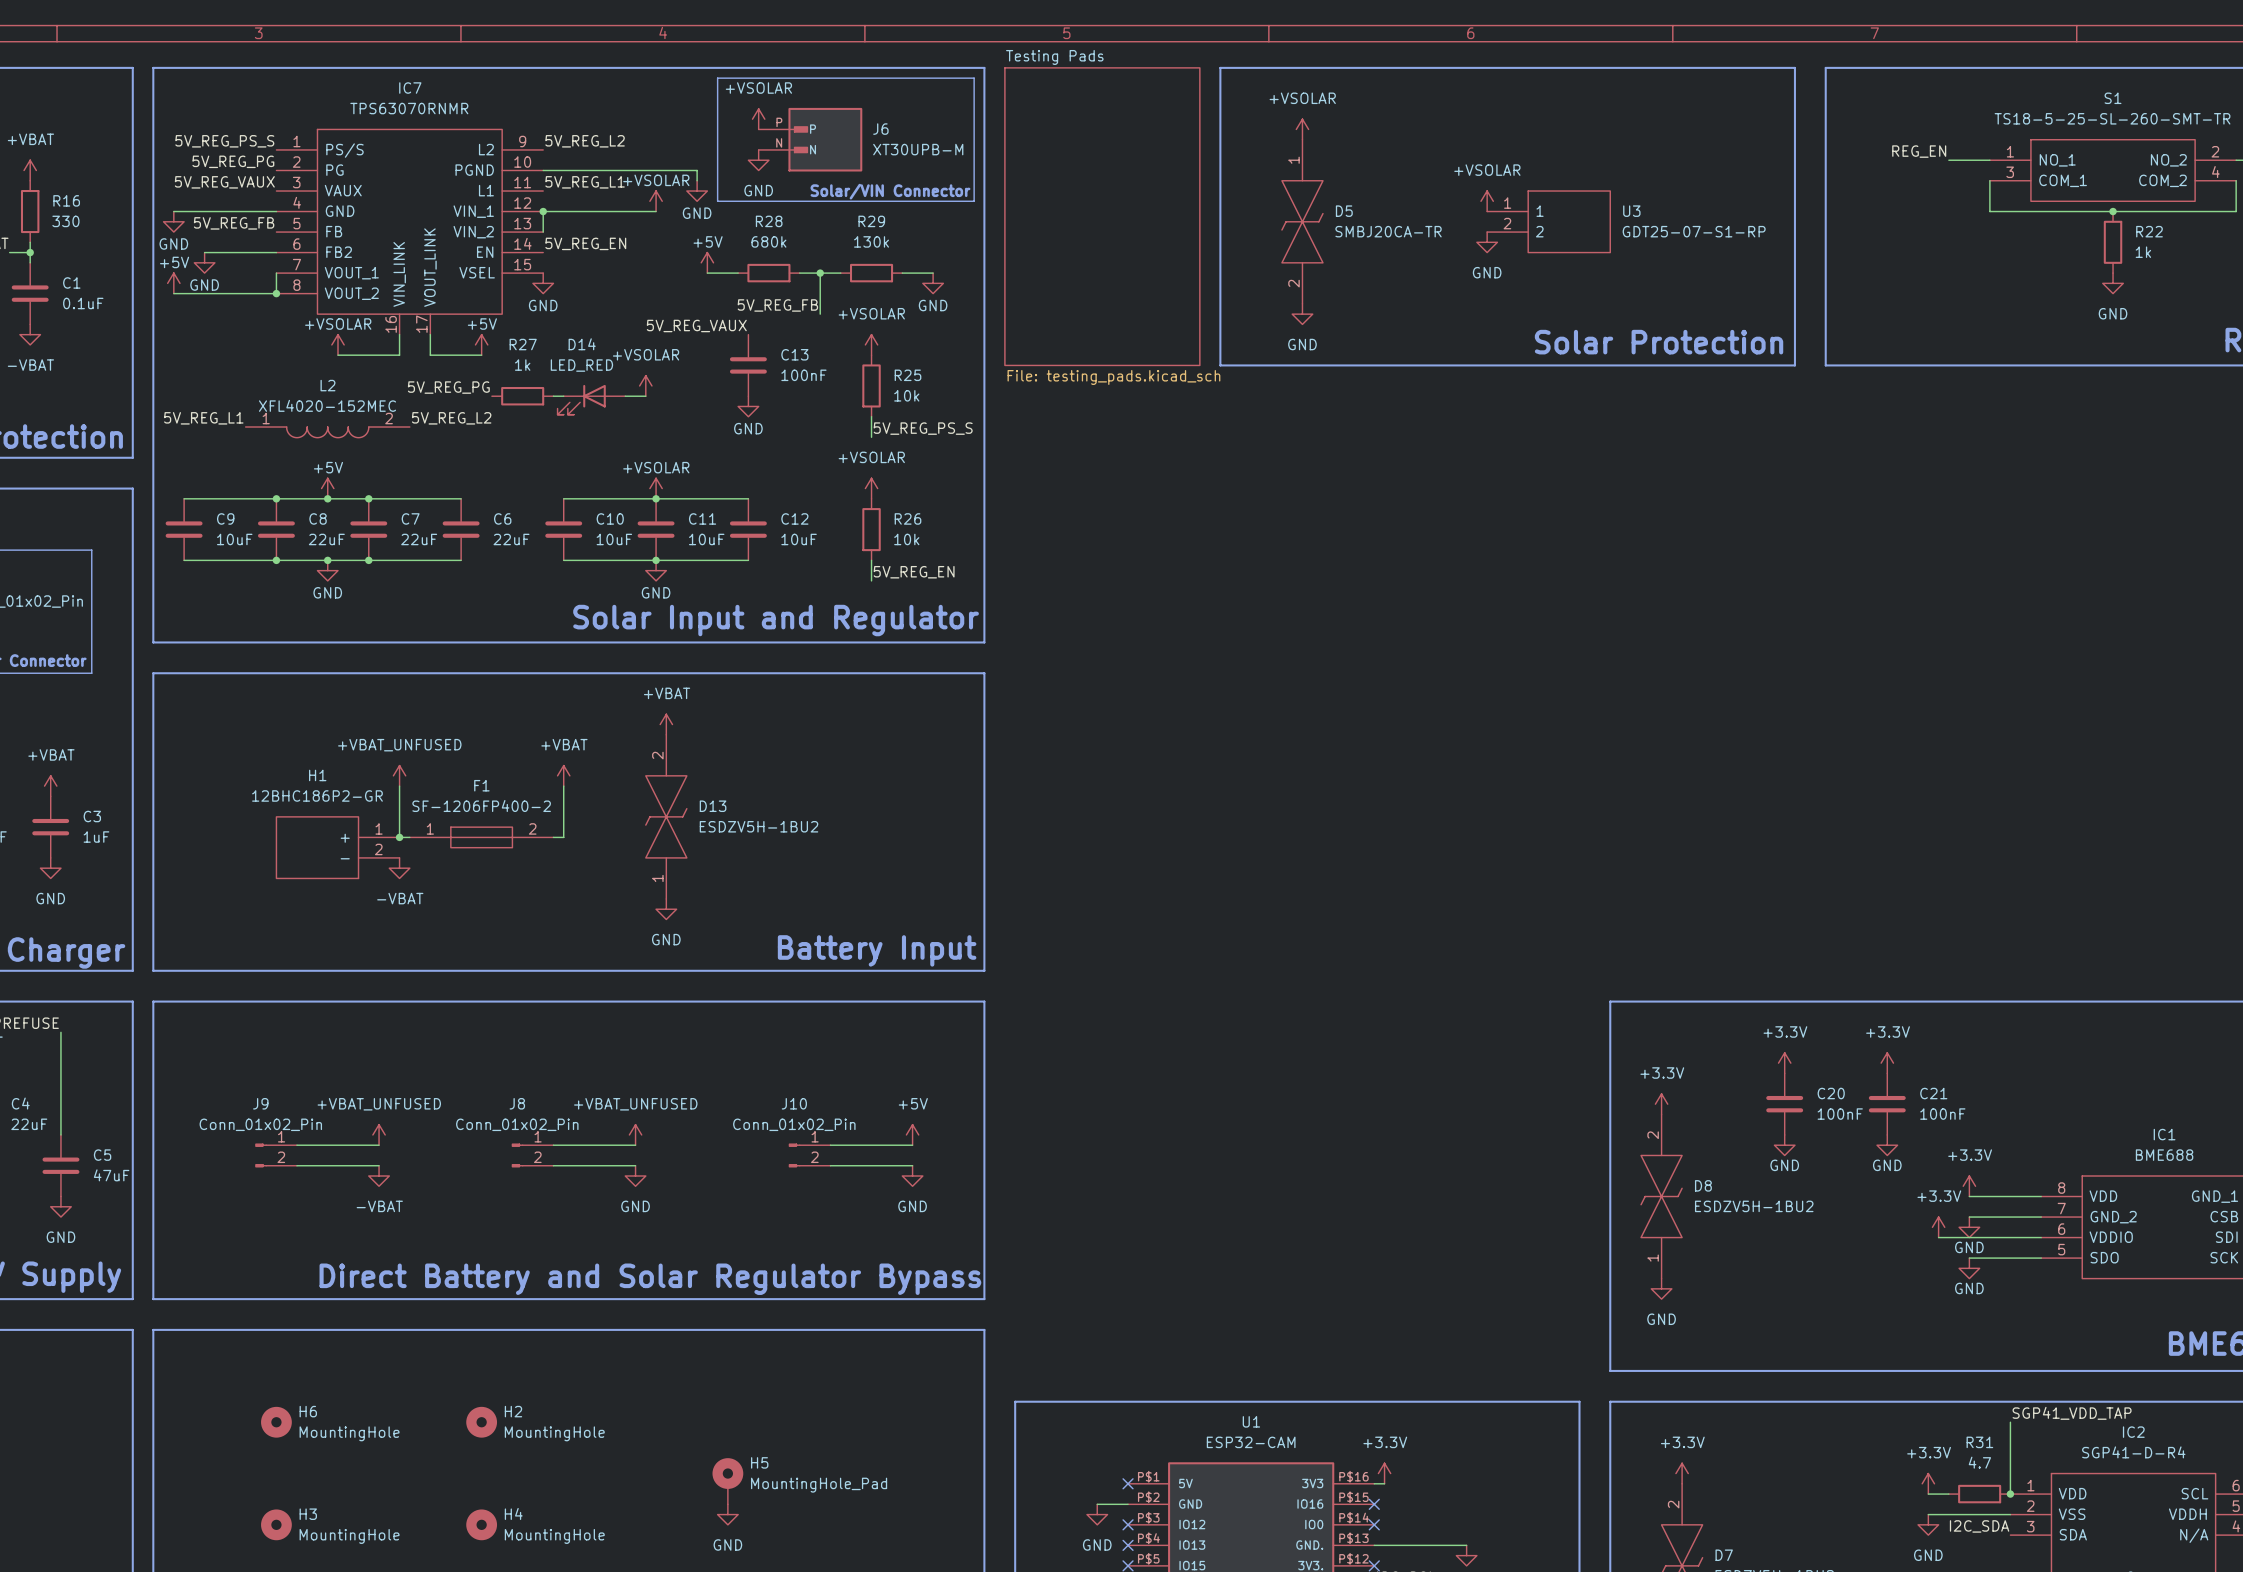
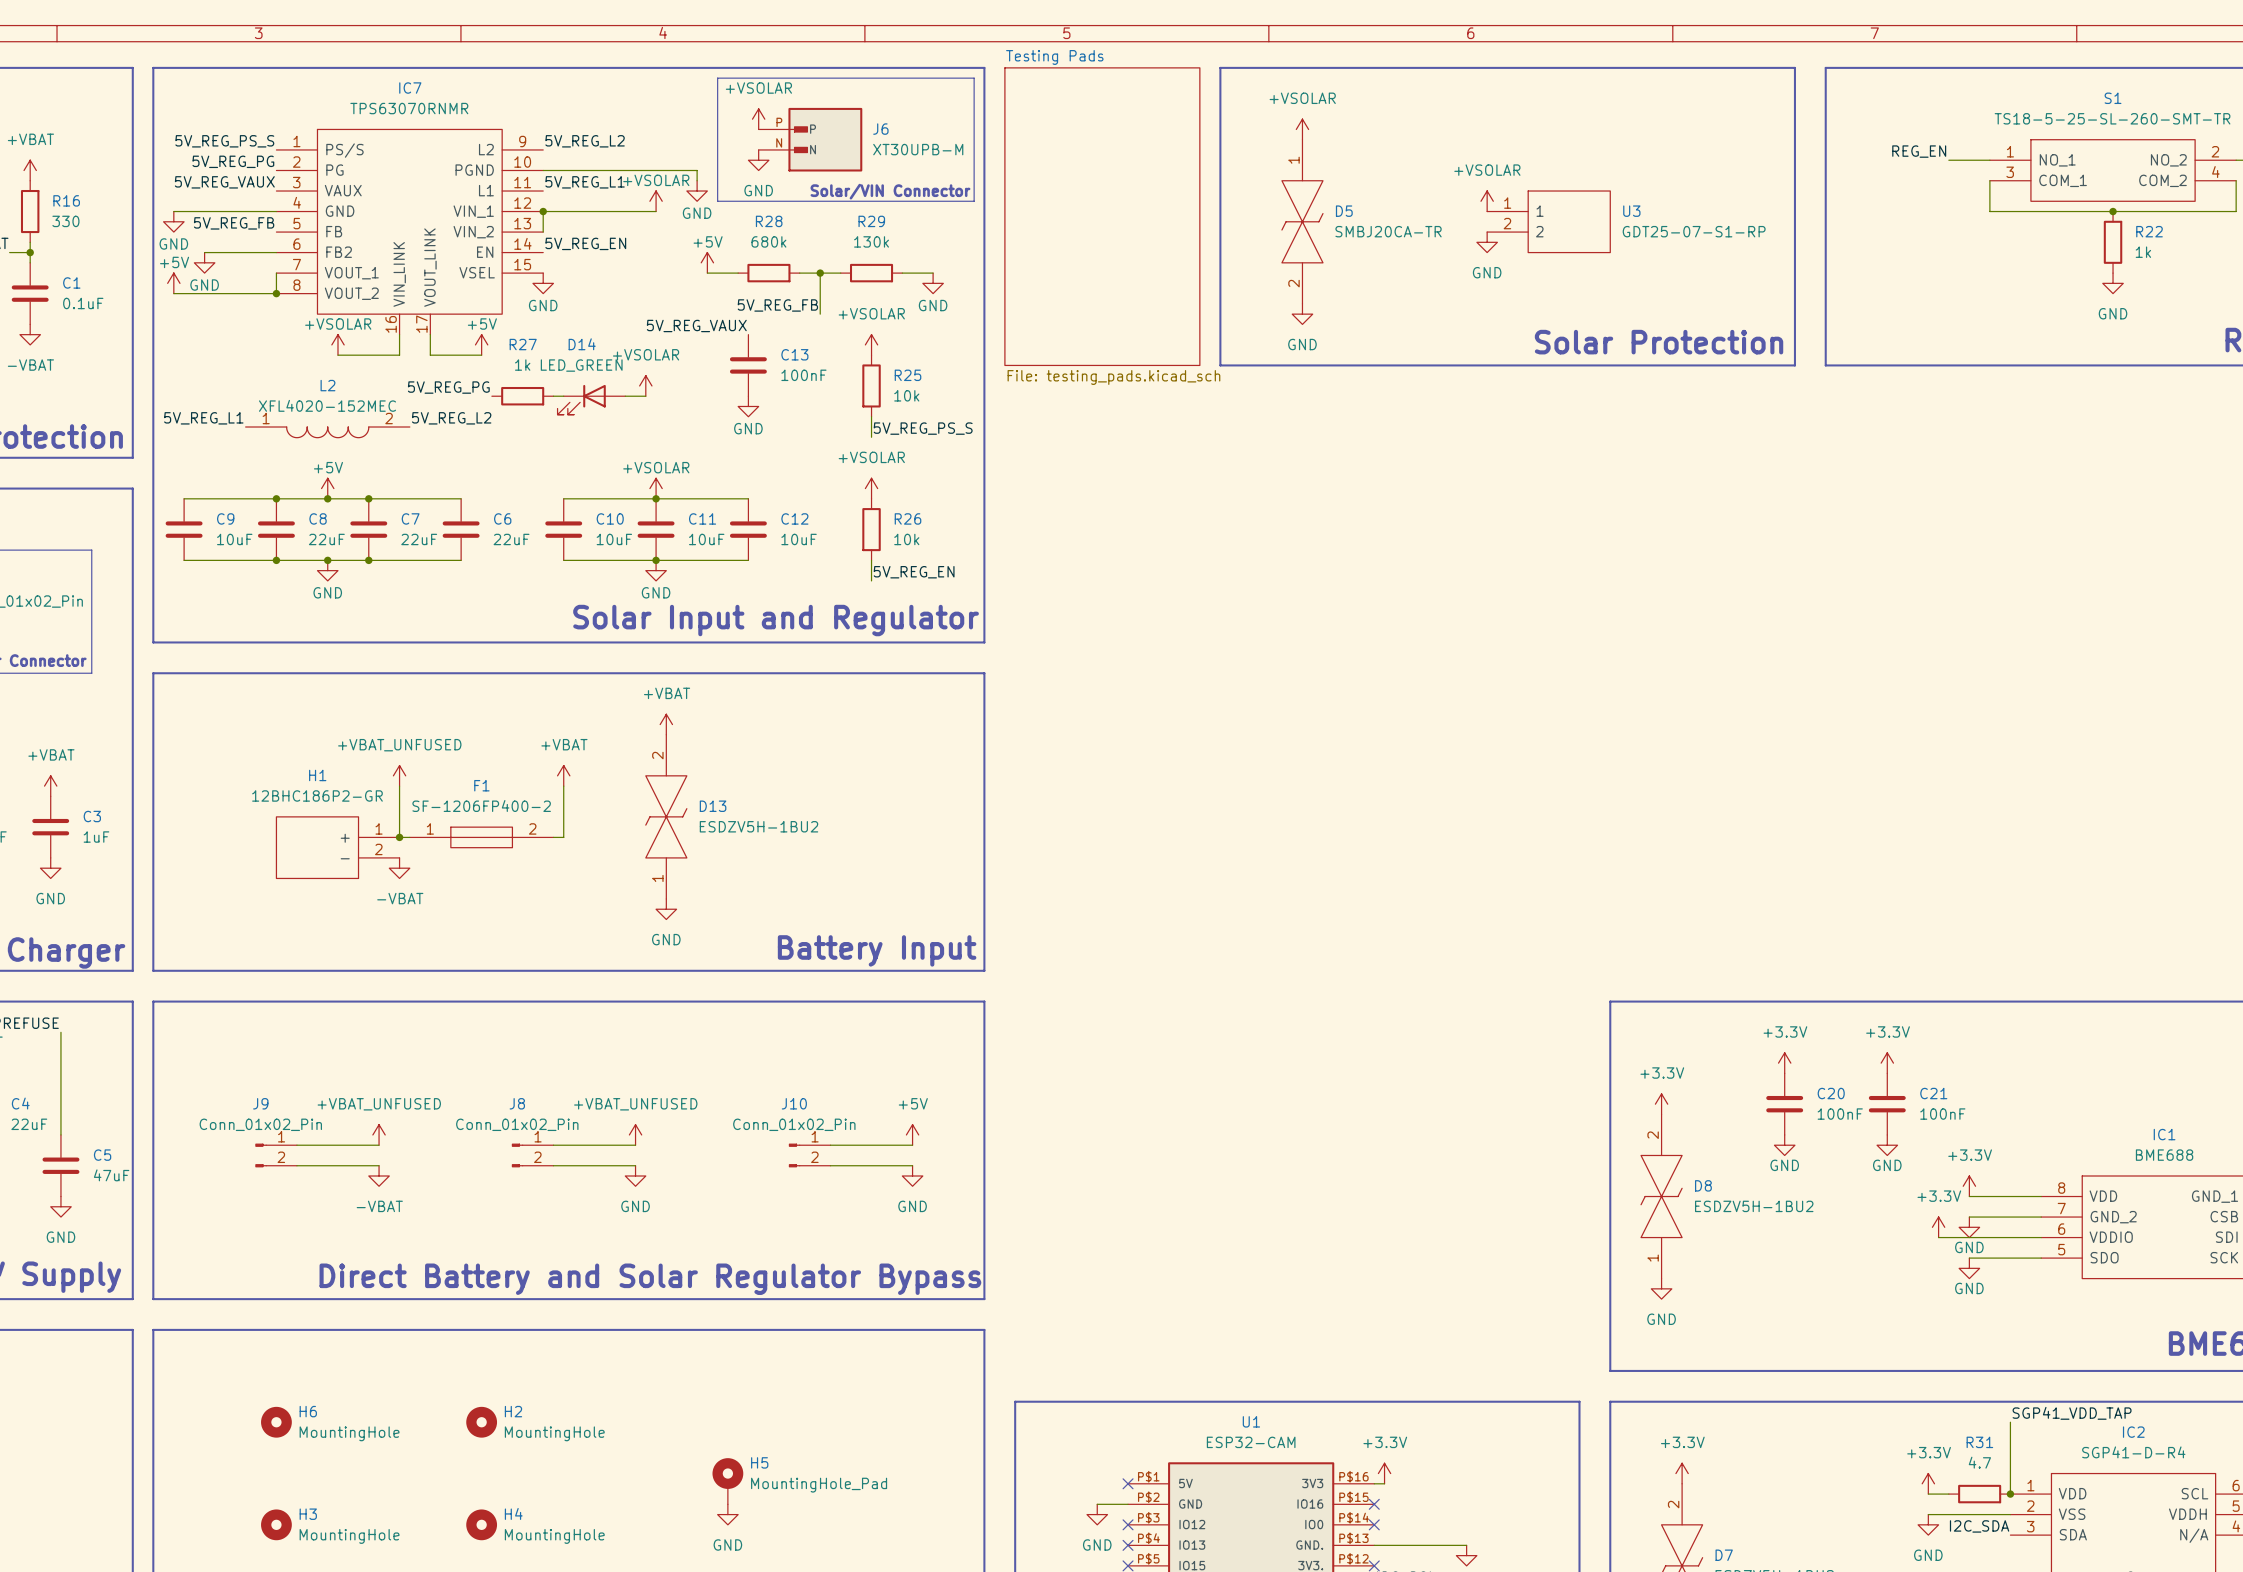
D14 value: LED_RED (581, 365) -> LED_GREEN (581, 365)

